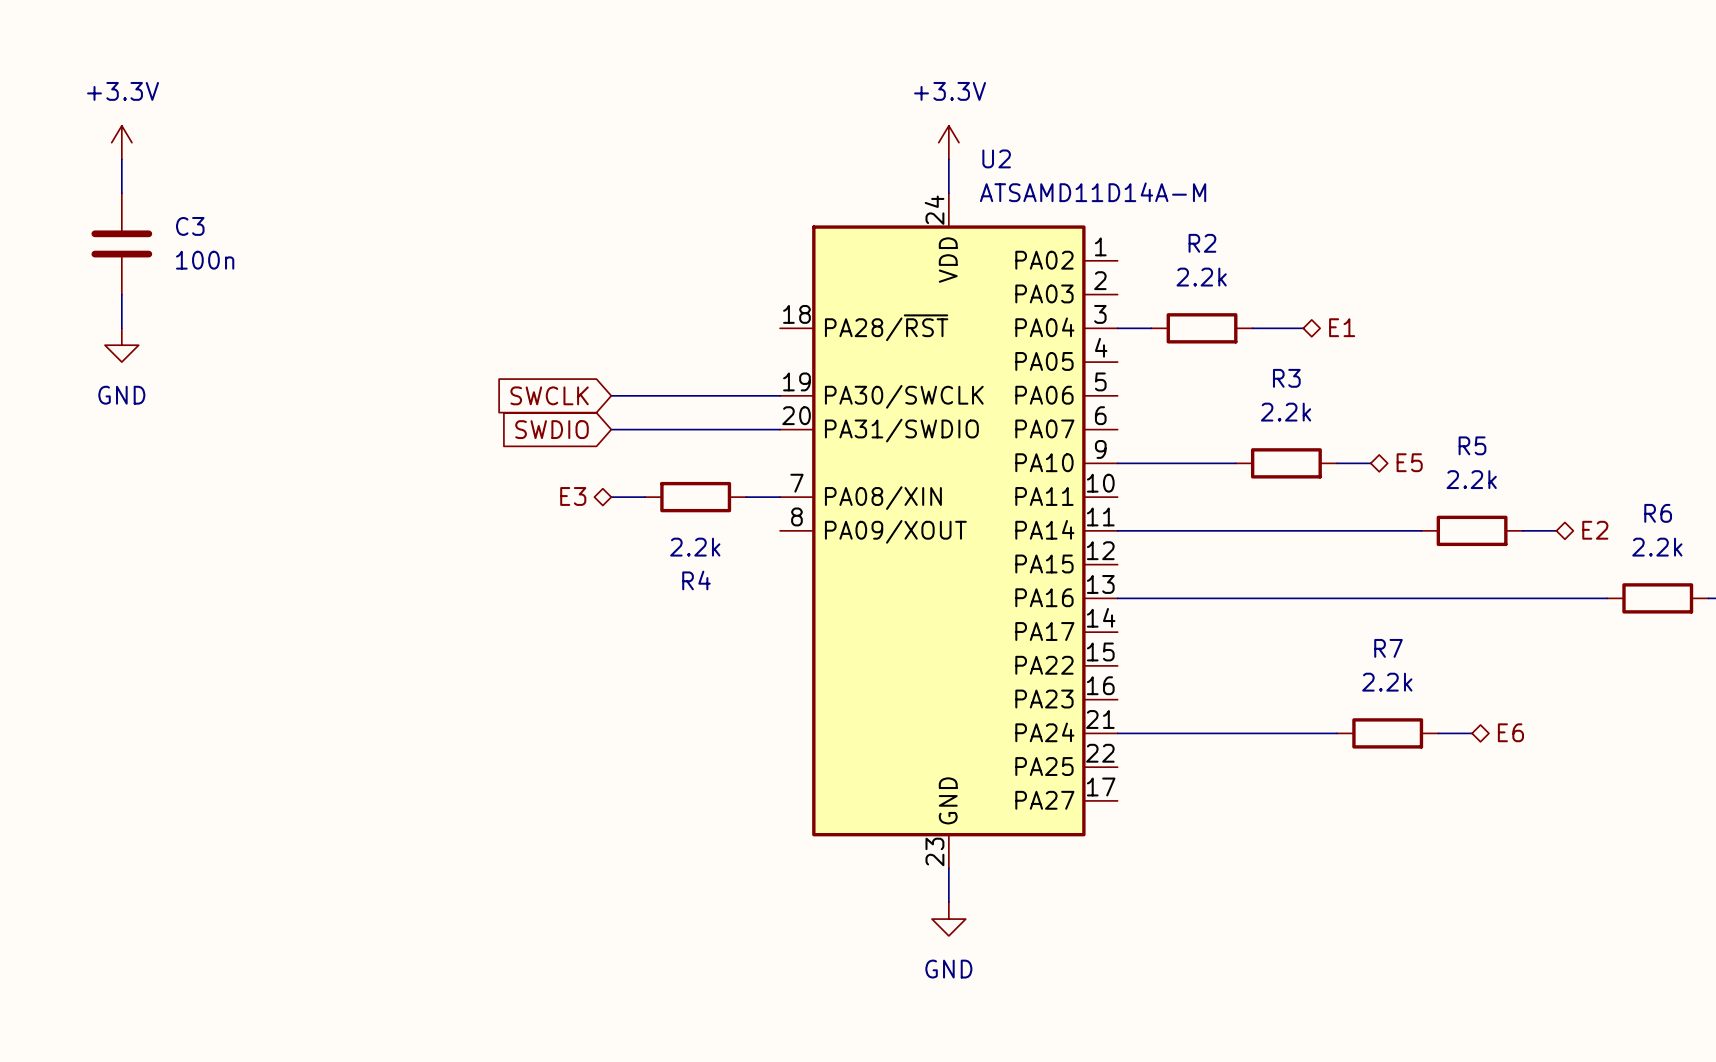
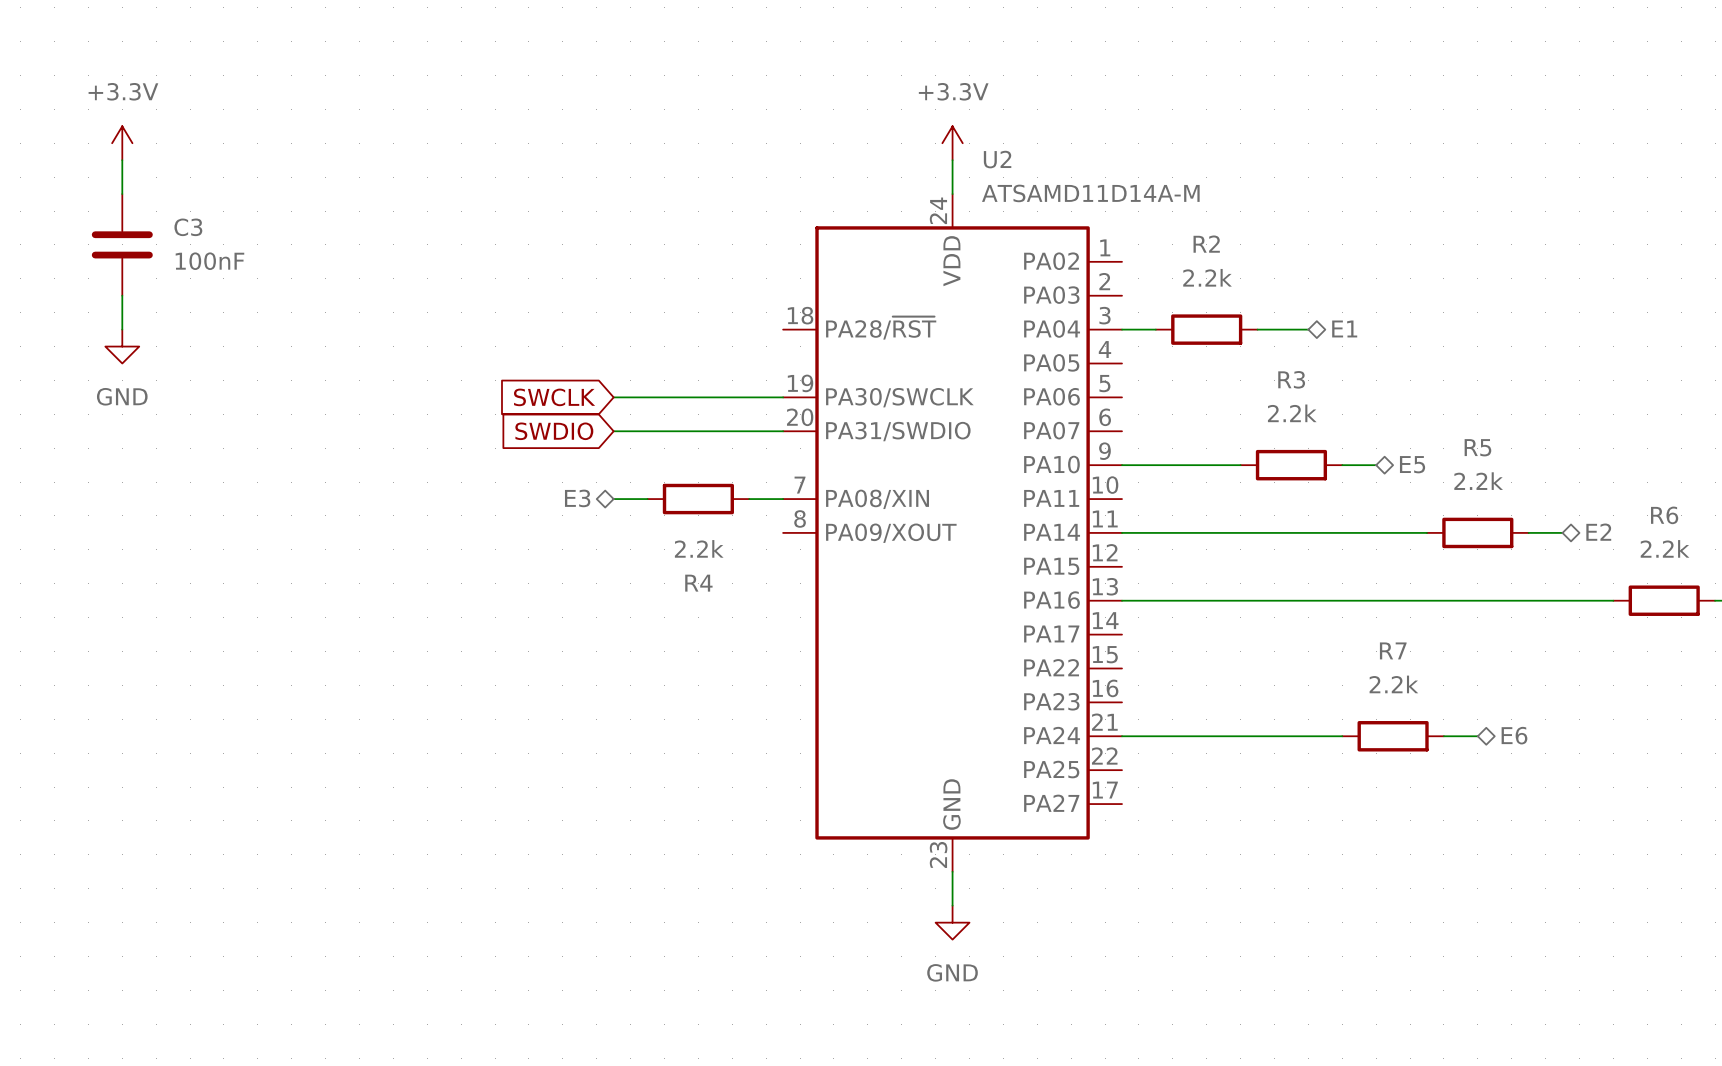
C3 value: 100n (205, 260) -> 100nF (209, 261)

